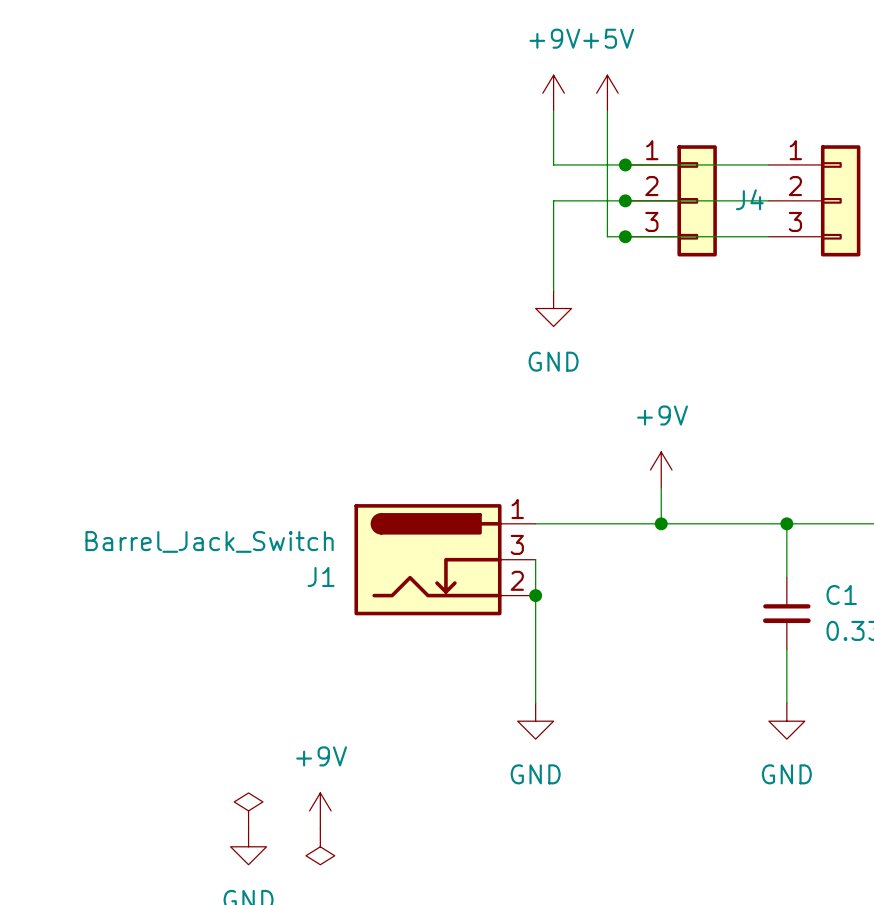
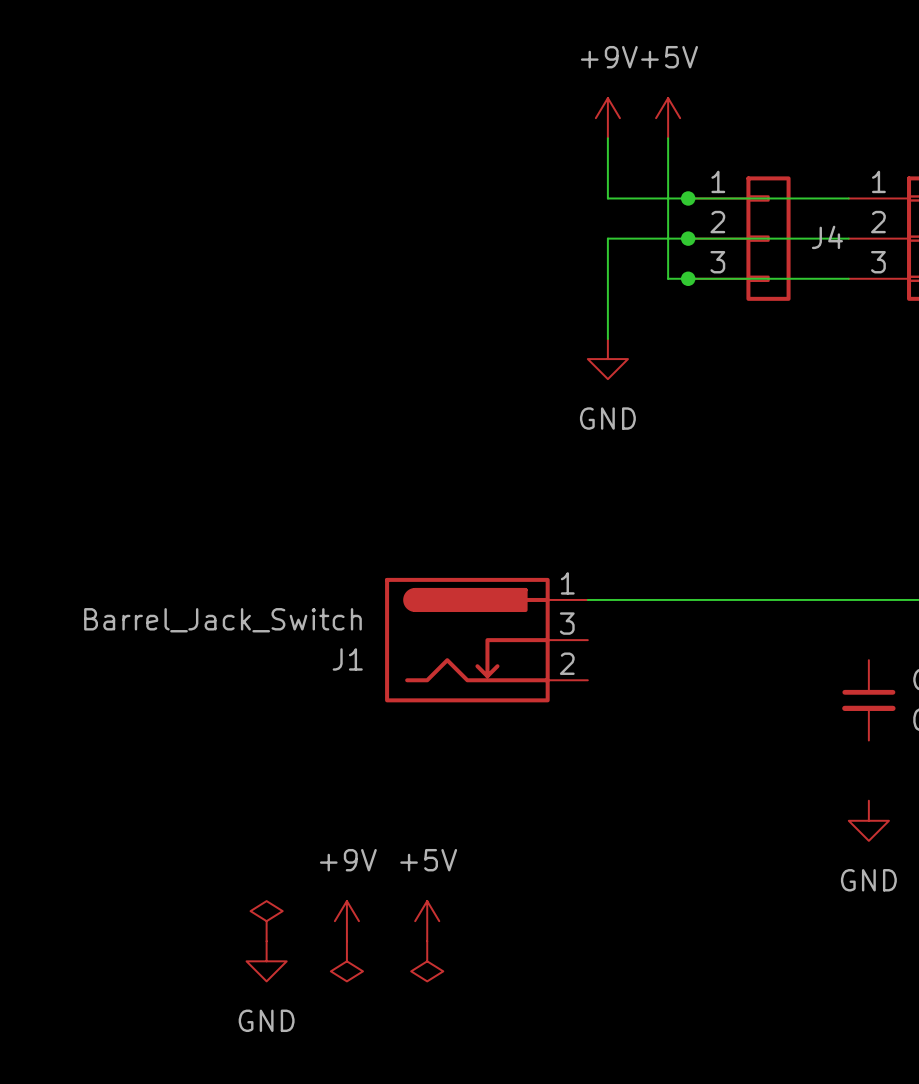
power symbol: +9V (661, 470) -> none
wire: (661, 487) (661, 523) -> none
junction: (661, 523) -> none
wire: (786, 523) (786, 577) -> none
junction: (786, 523) -> none
wire: (535, 559) (535, 703) -> none
junction: (535, 595) -> none
wire: (786, 649) (786, 703) -> none
power symbol: GND (535, 721) -> none
power symbol: none -> +5V (427, 921)
power symbol: none -> (427, 961)

